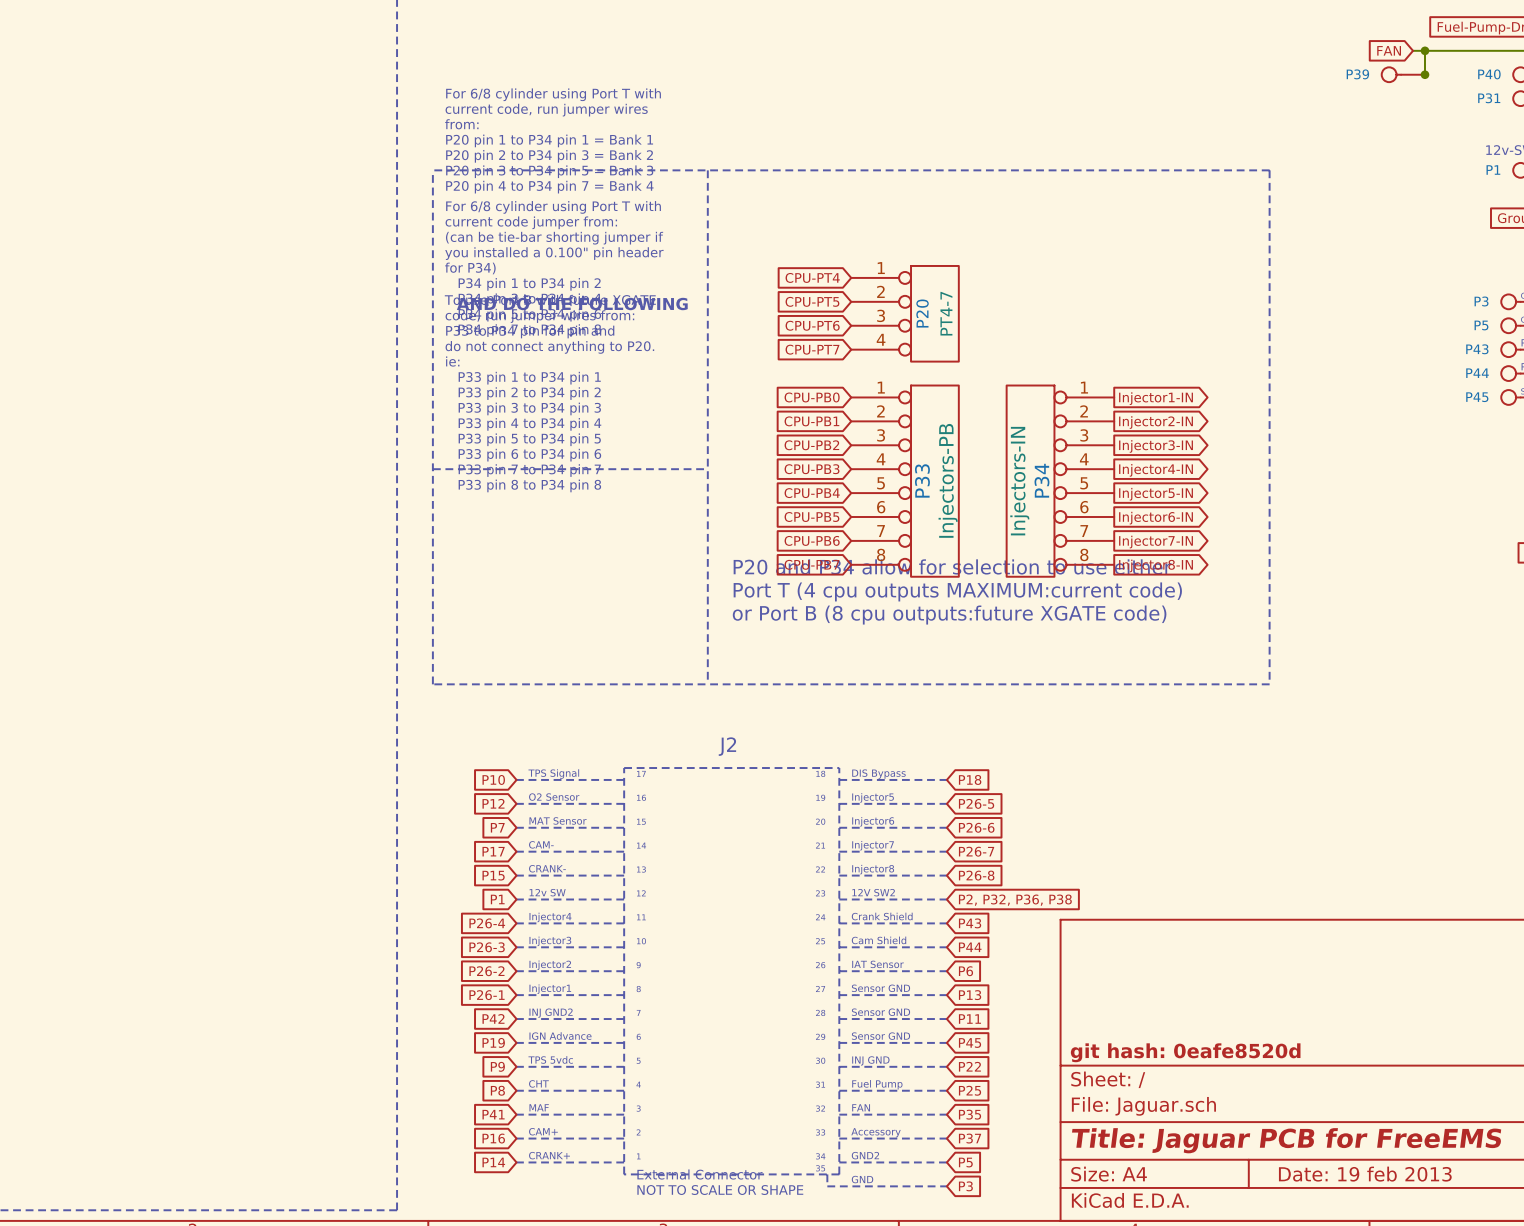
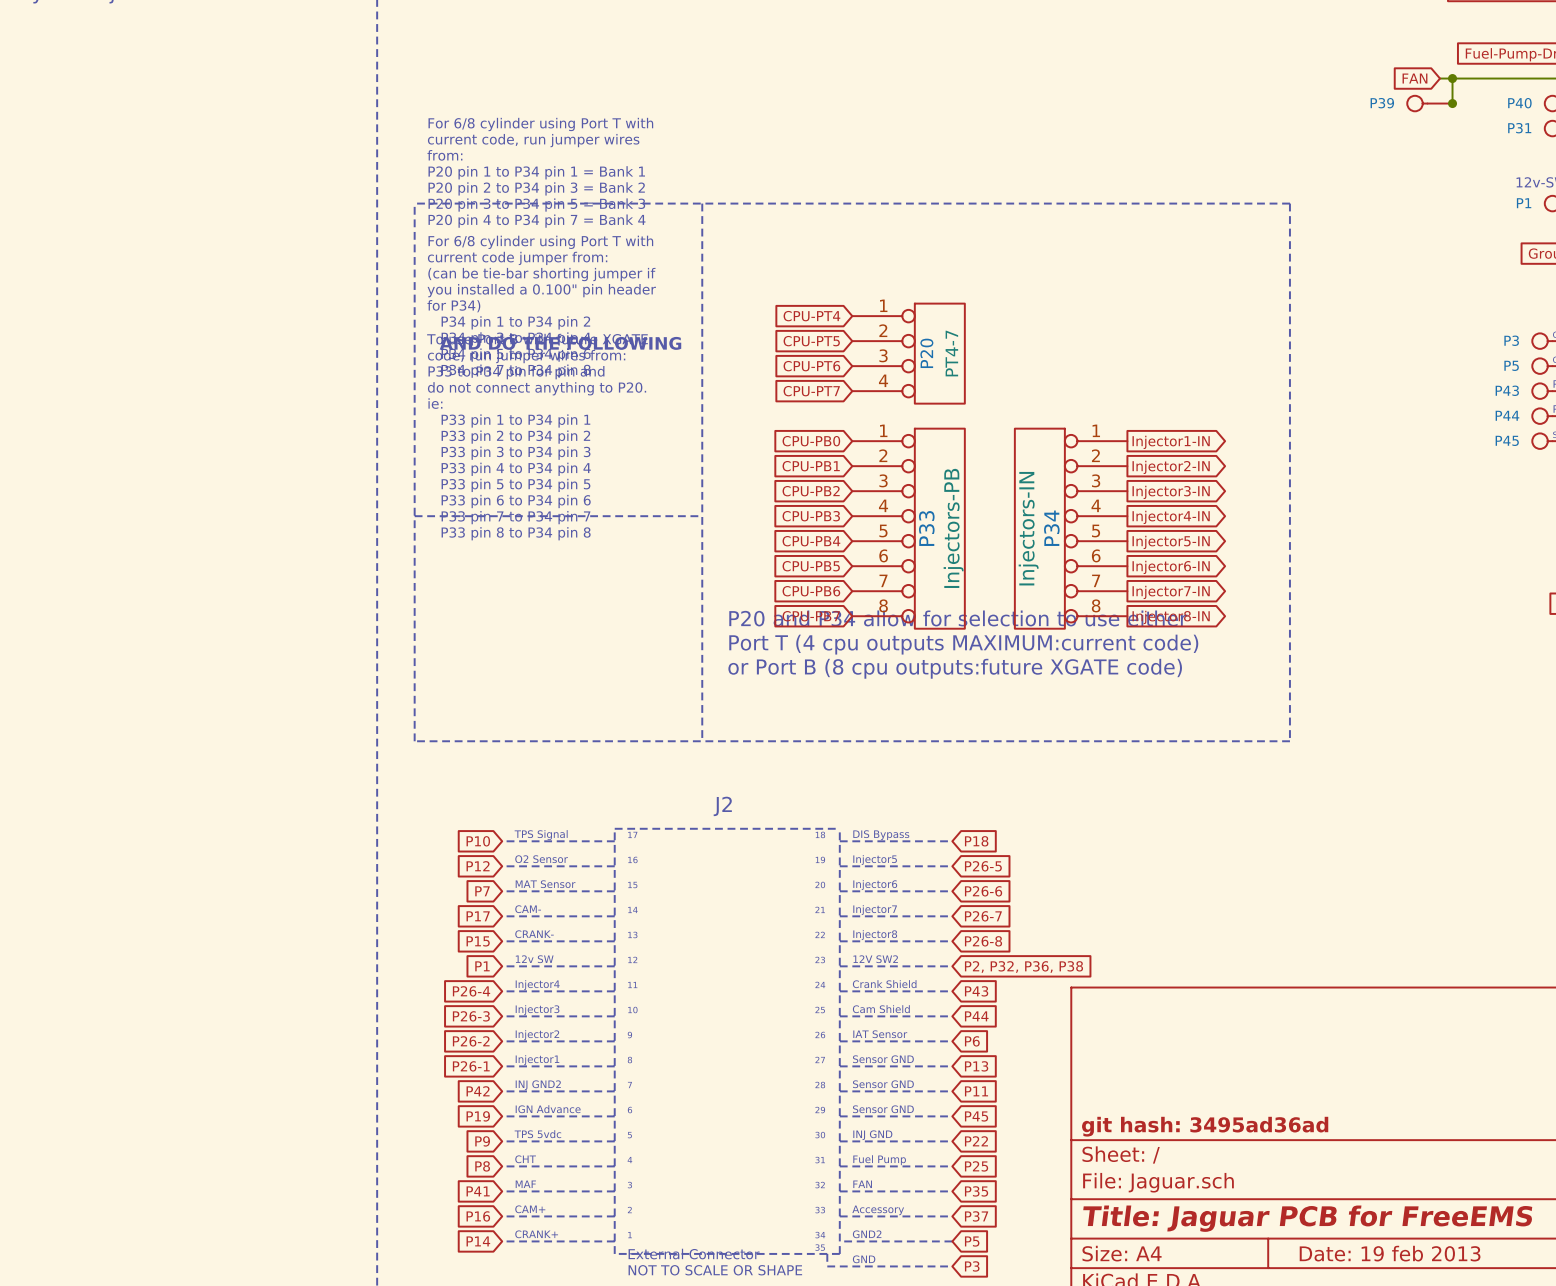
title block: git hash: 0eafe8520d (1185, 1052) -> git hash: 3495ad36ad (1205, 1126)

